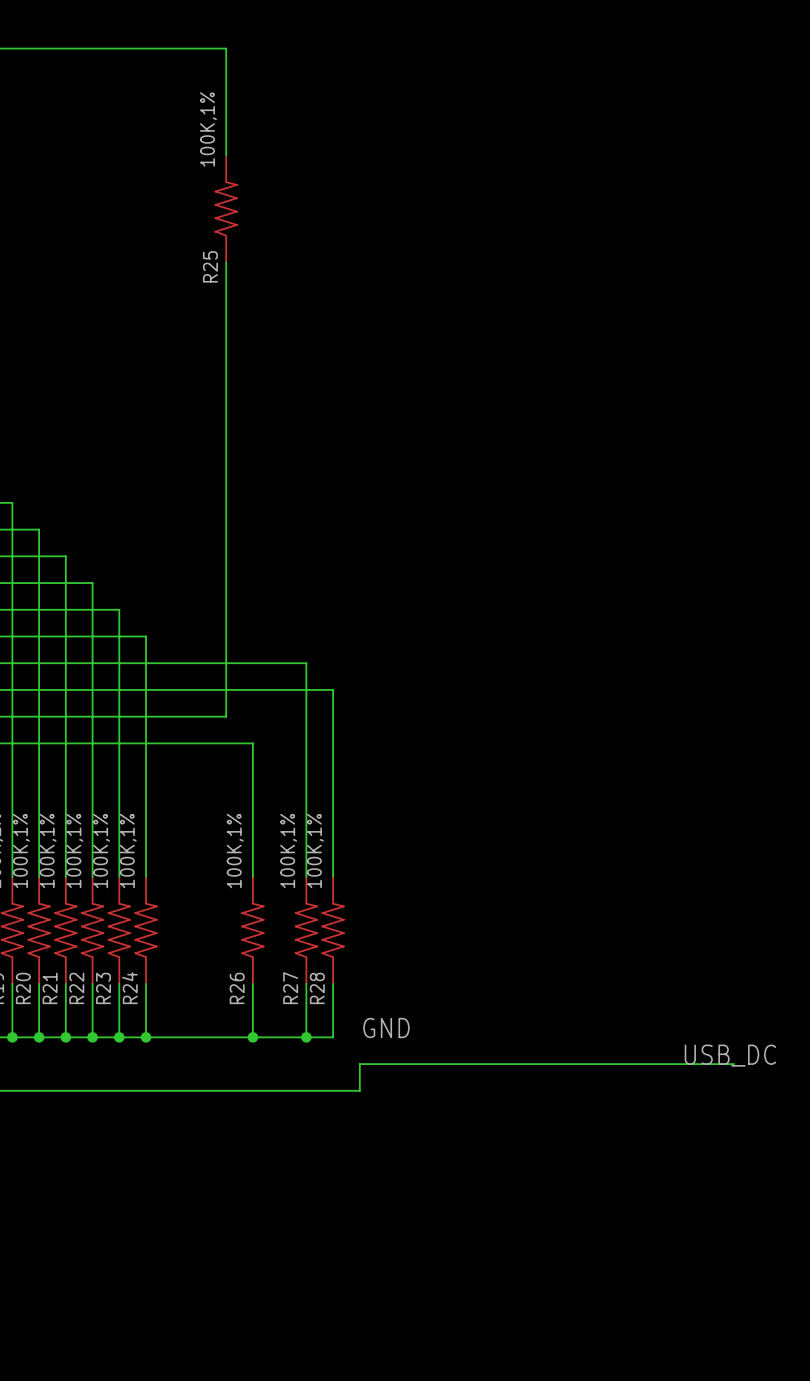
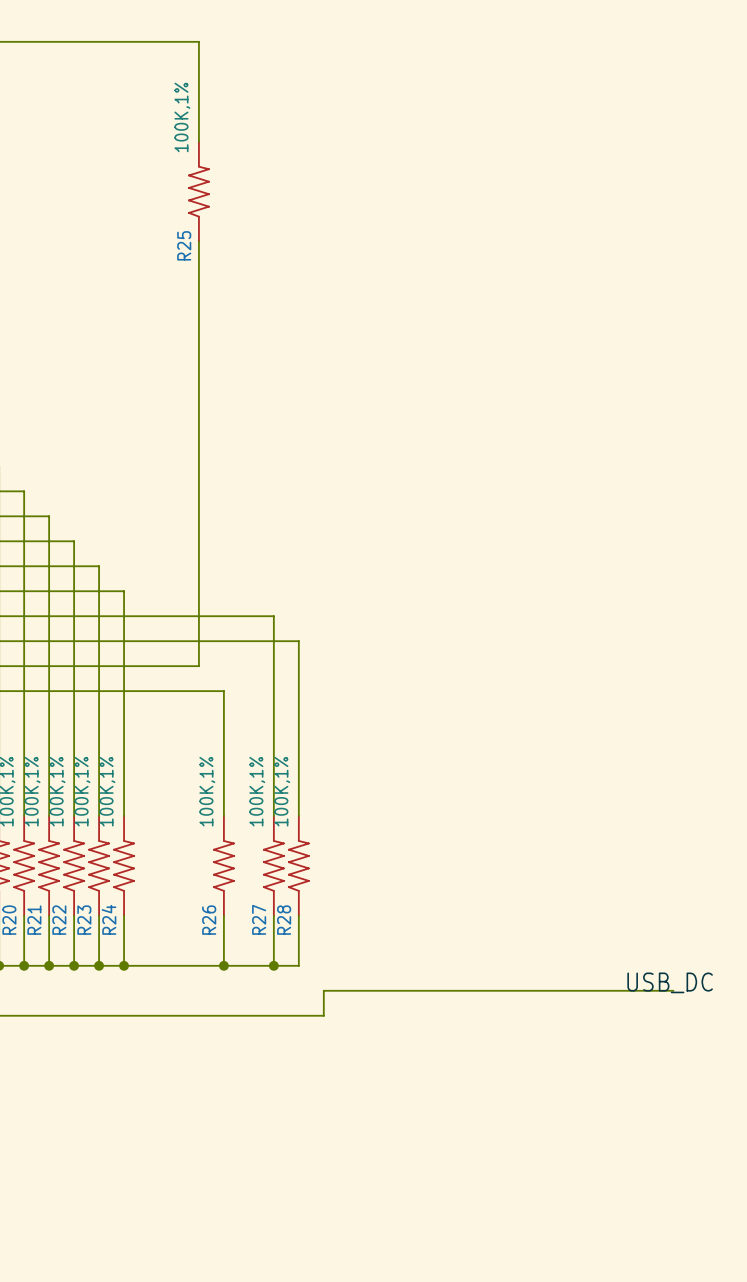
label: GND (386, 1028) -> none

